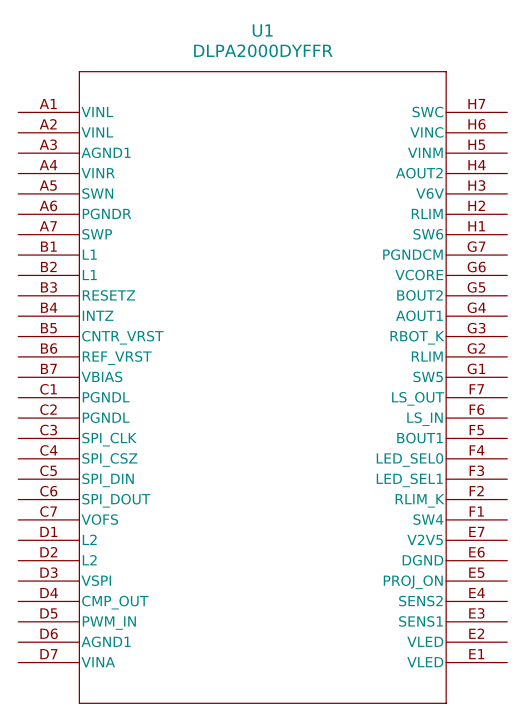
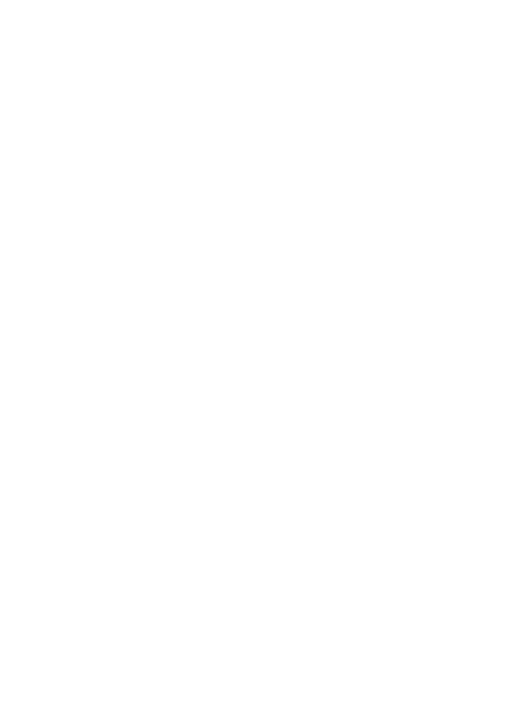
U1: DLPA2000DYFFR (262, 387) -> none

